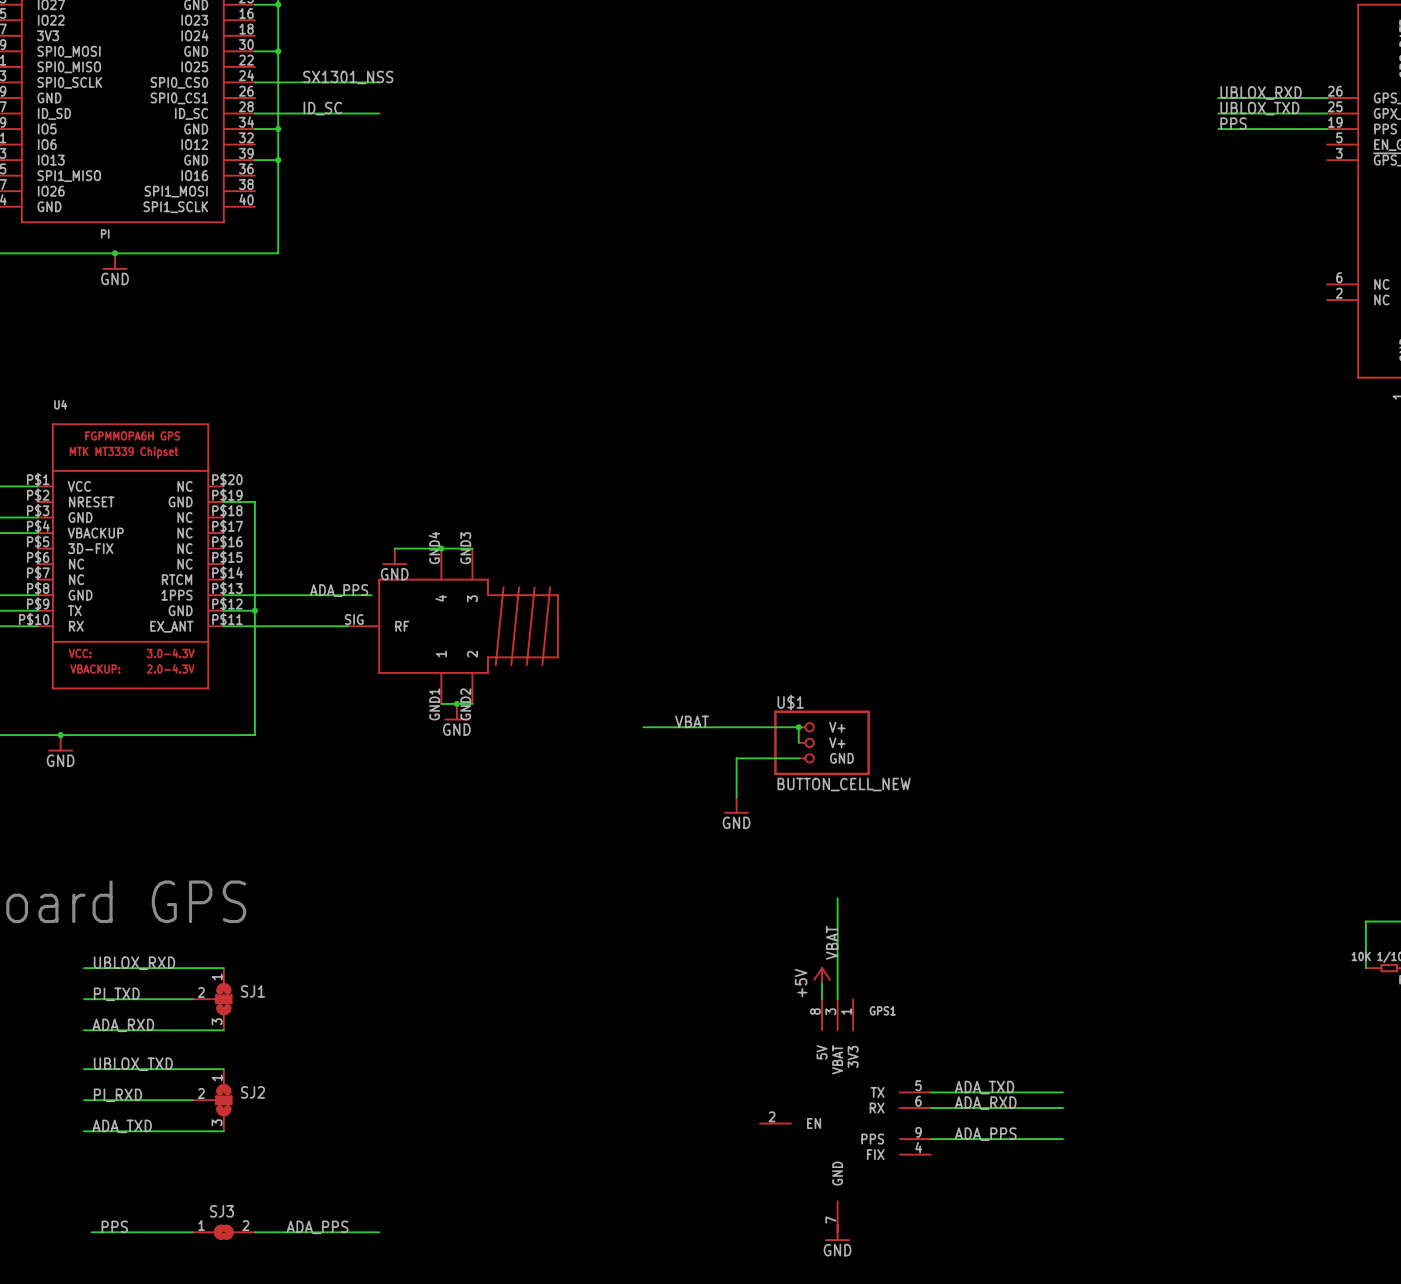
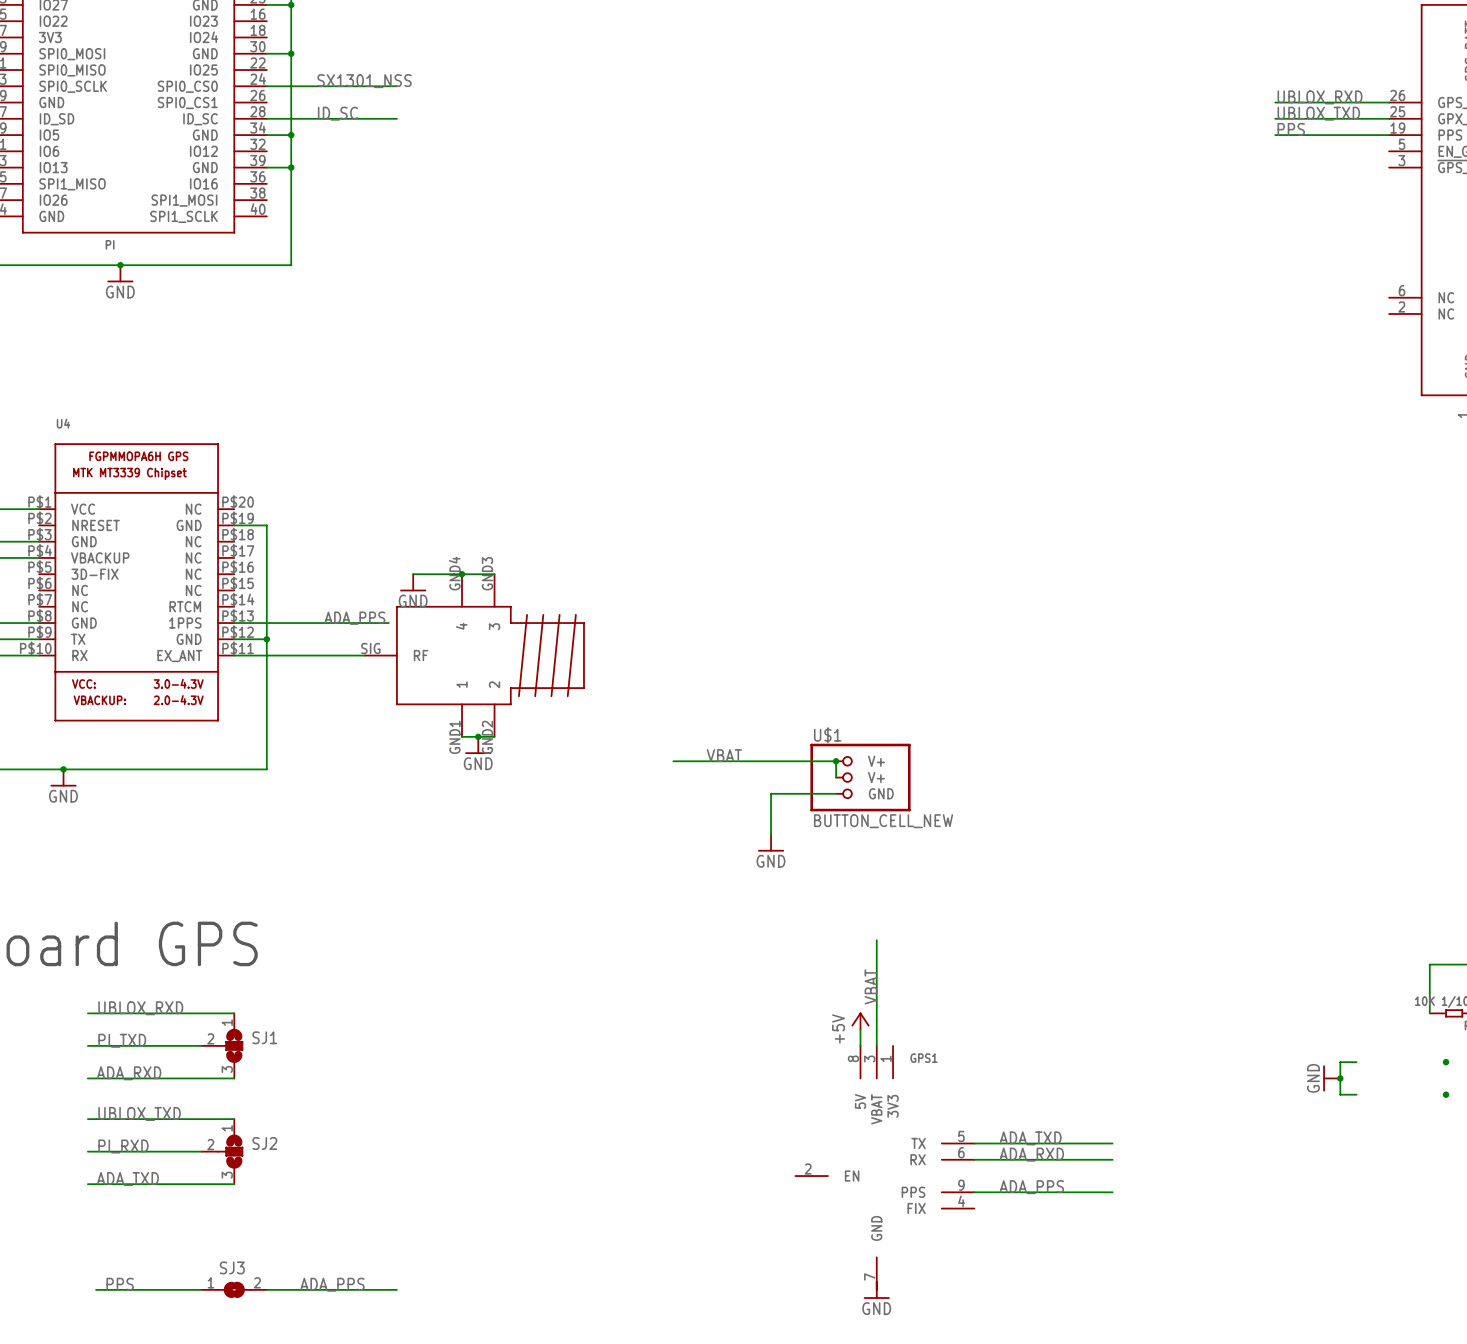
wire: none -> (1356, 1062) (1340, 1062) (1340, 1094) (1356, 1094)
junction: none -> (1446, 1062)
power symbol: none -> GND (1331, 1078)
junction: none -> (1340, 1078)
junction: none -> (1446, 1094)

